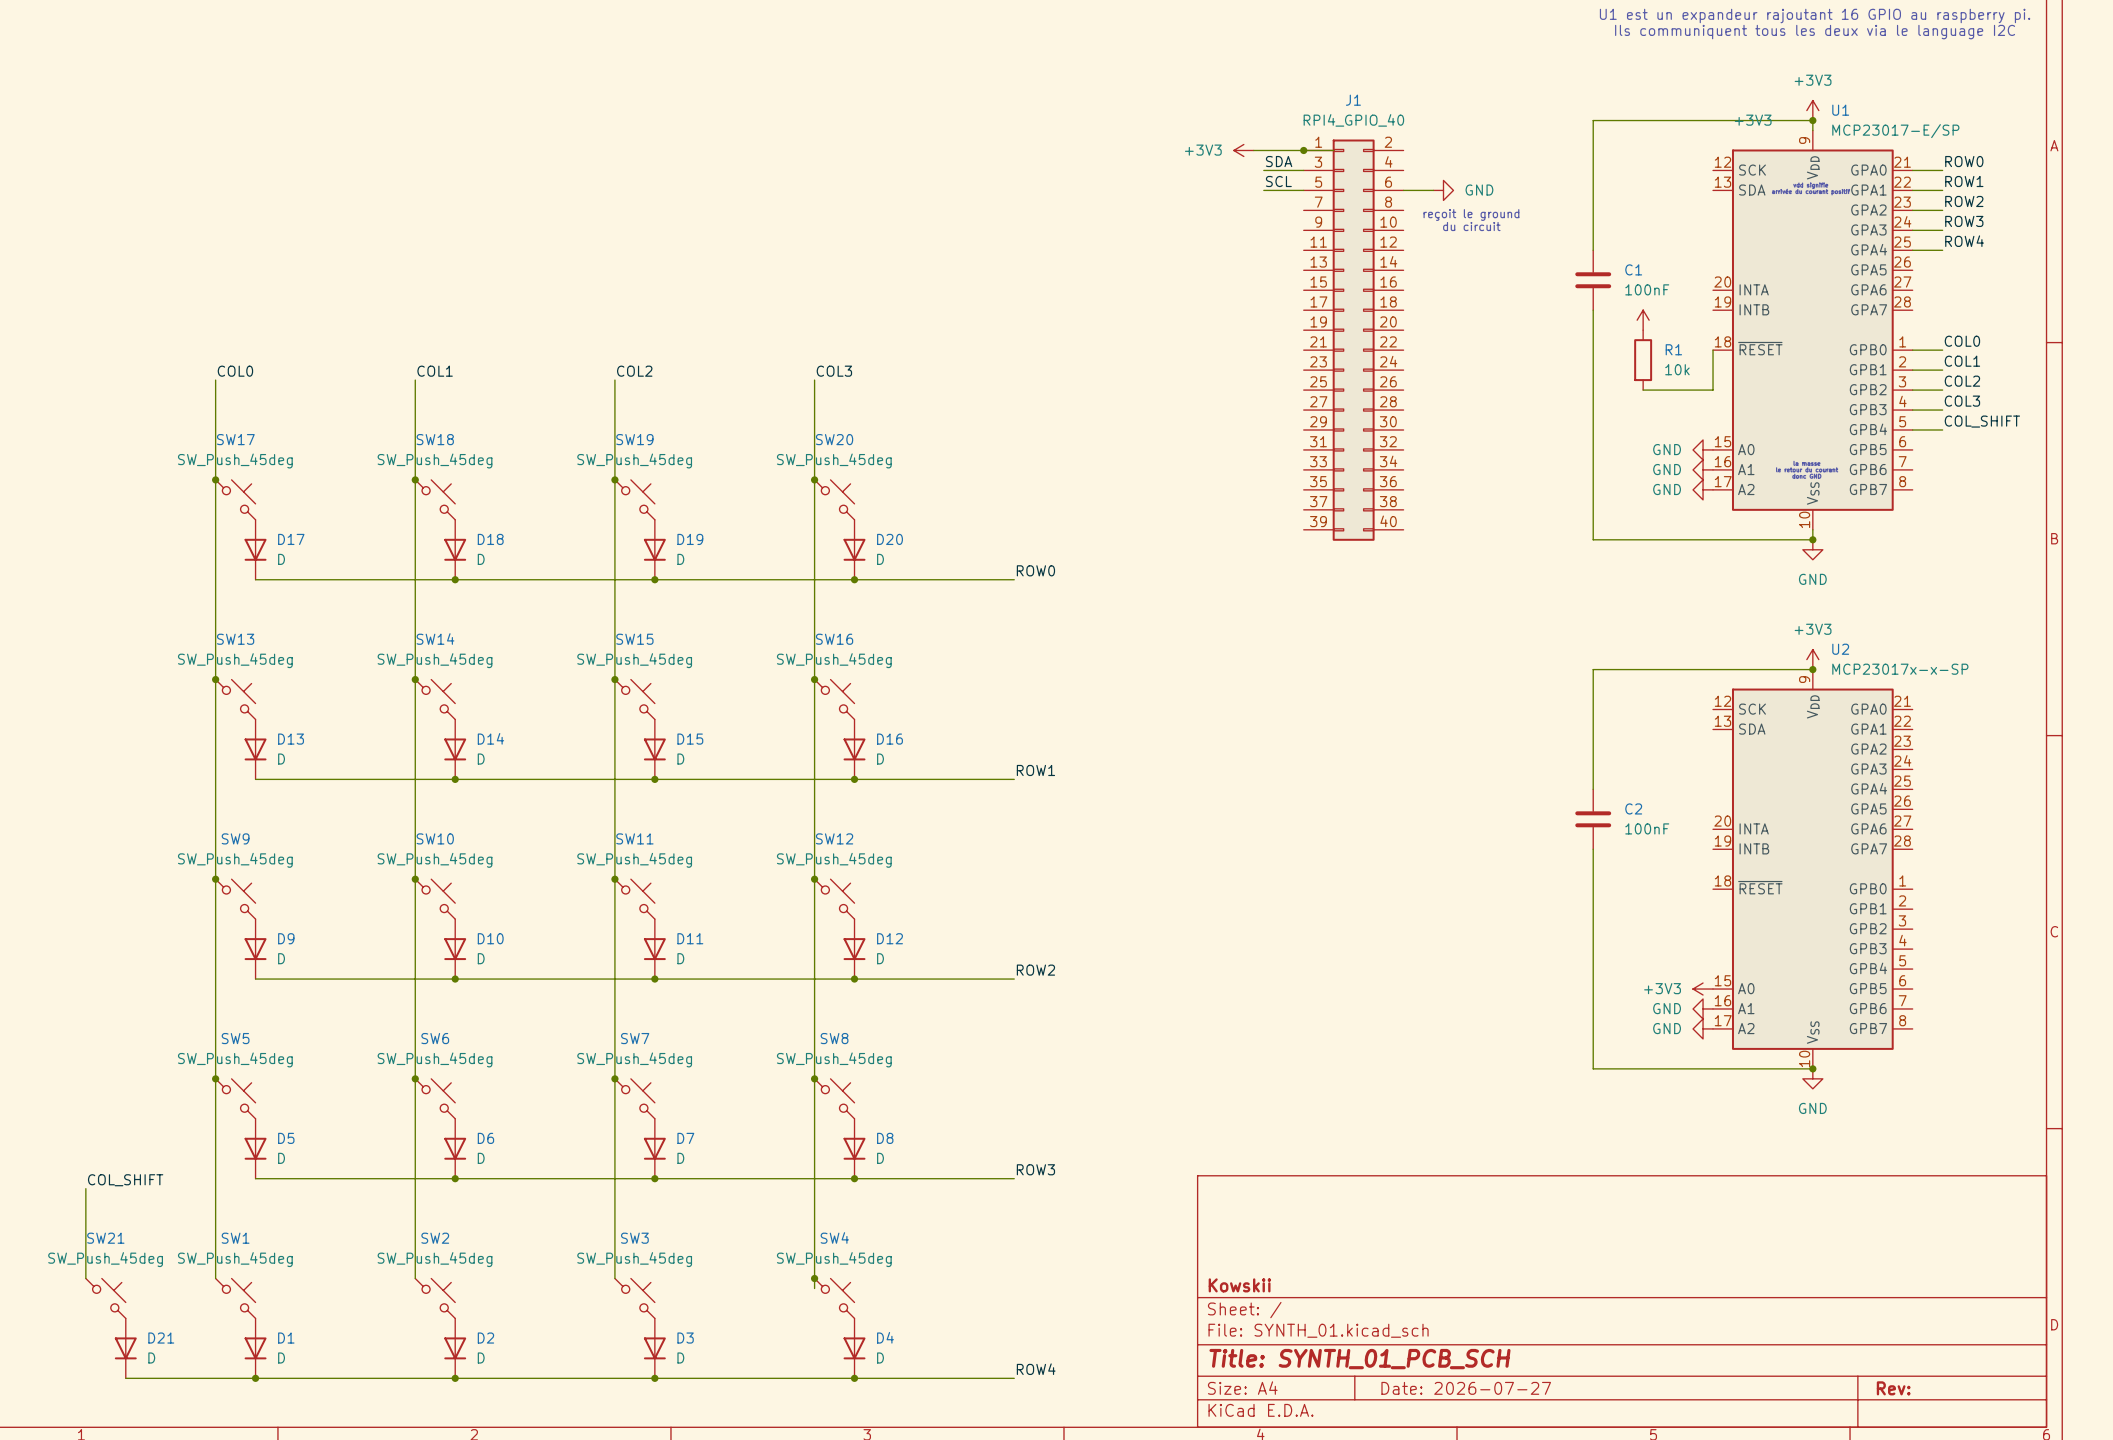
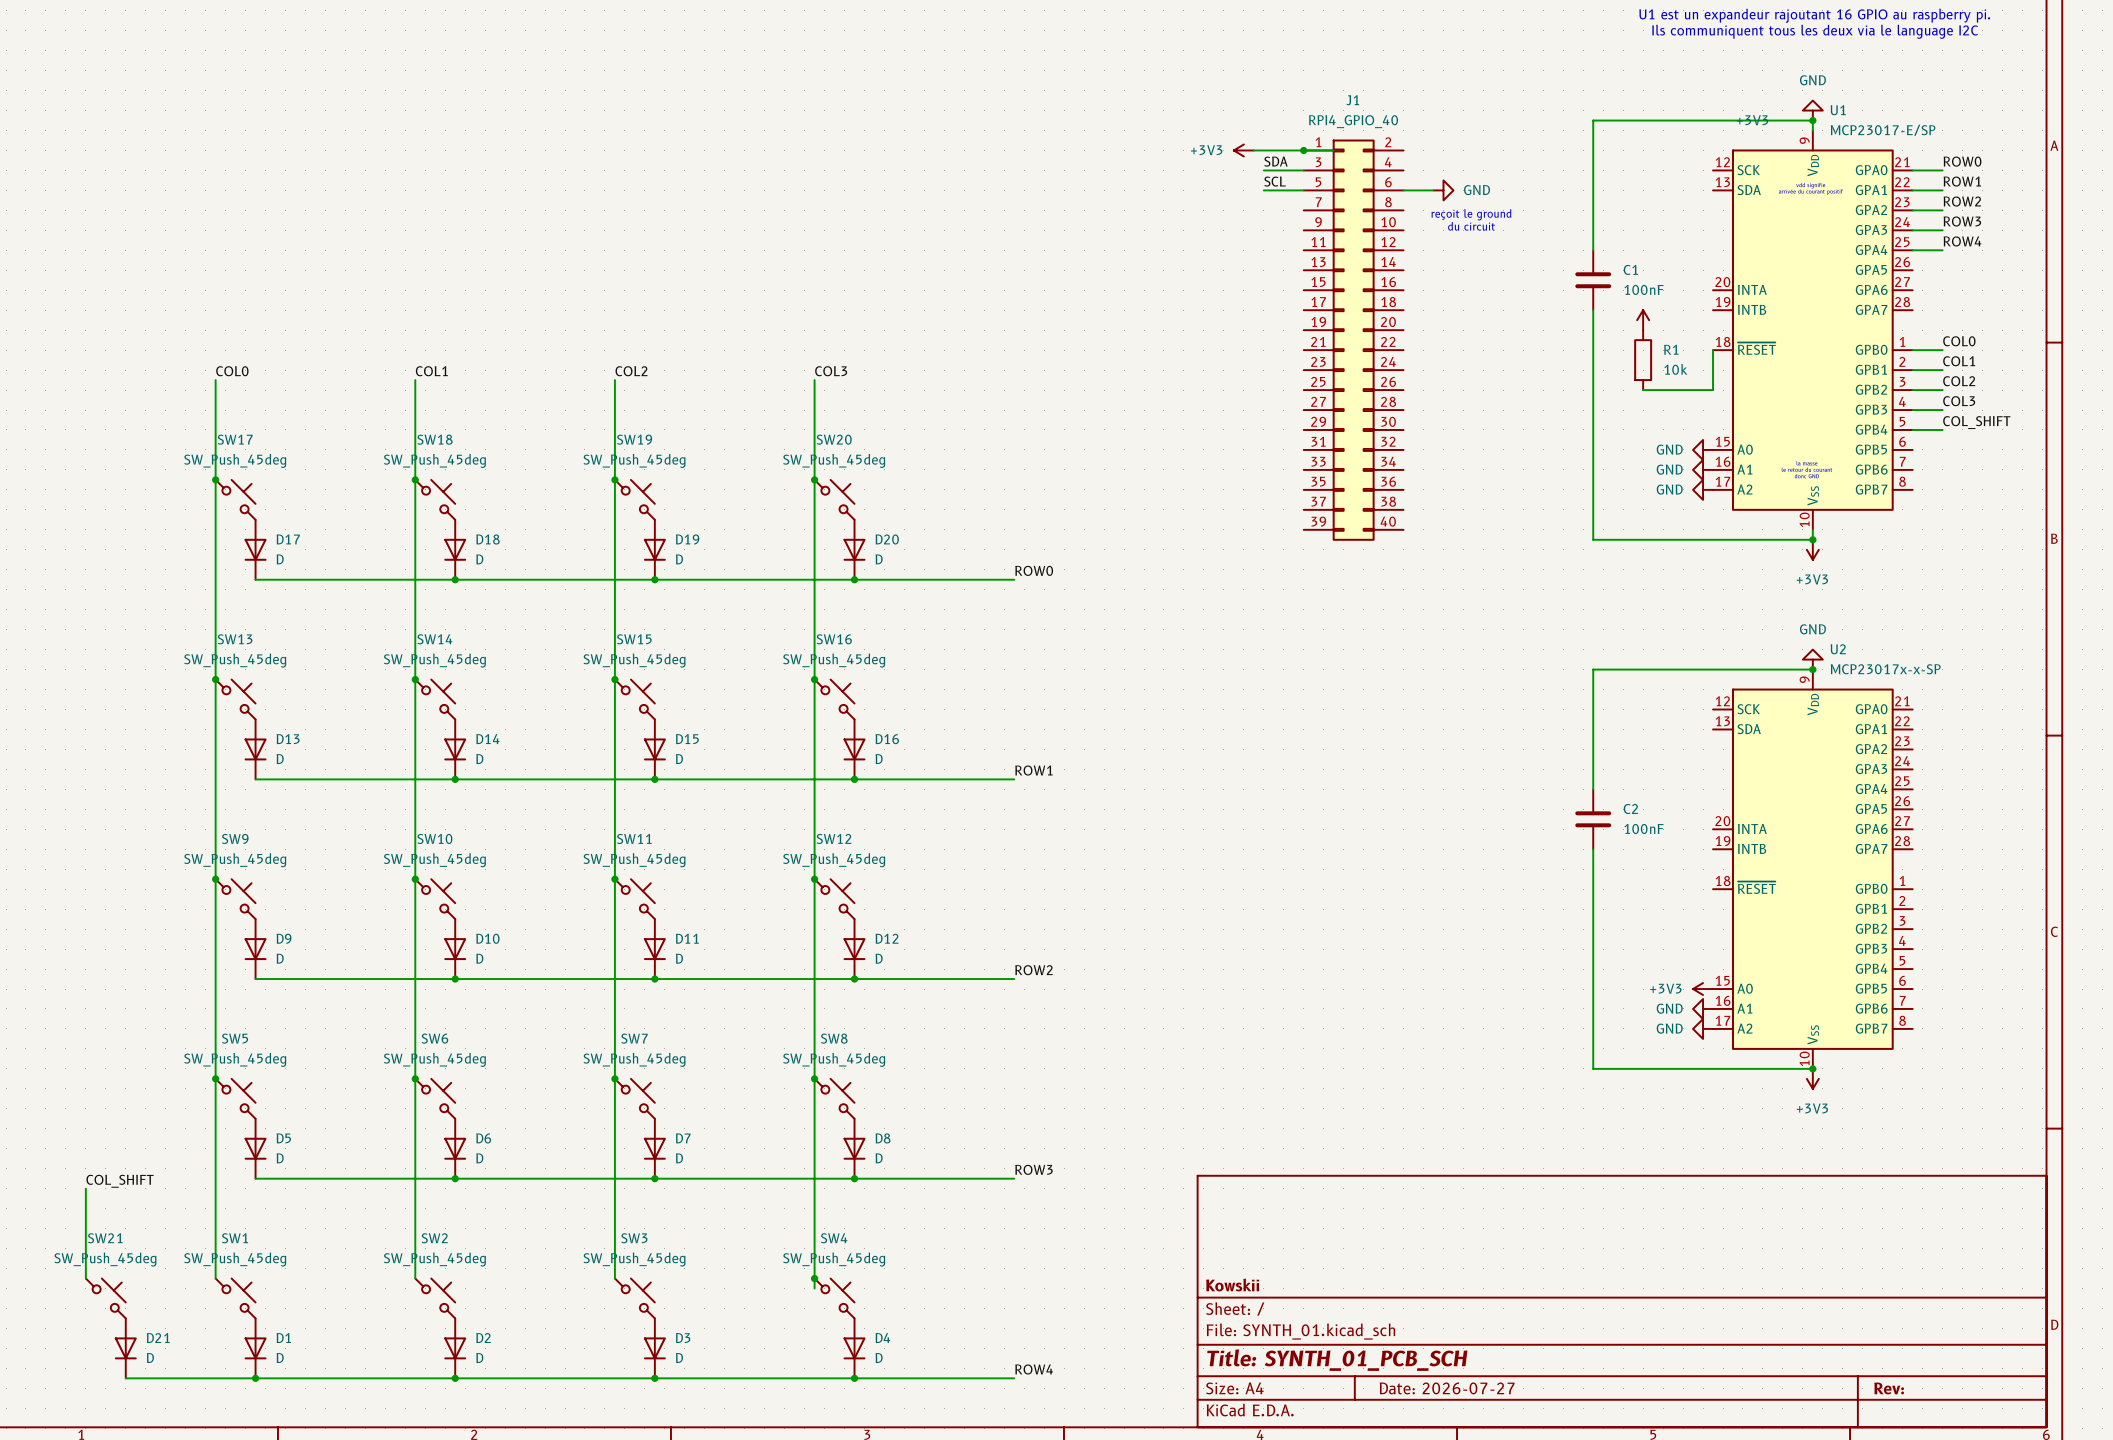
power symbol: +3V3 (1812, 110) -> GND (1812, 110)
power symbol: GND (1812, 549) -> +3V3 (1812, 549)
power symbol: +3V3 (1812, 659) -> GND (1812, 659)
power symbol: GND (1812, 1078) -> +3V3 (1812, 1078)

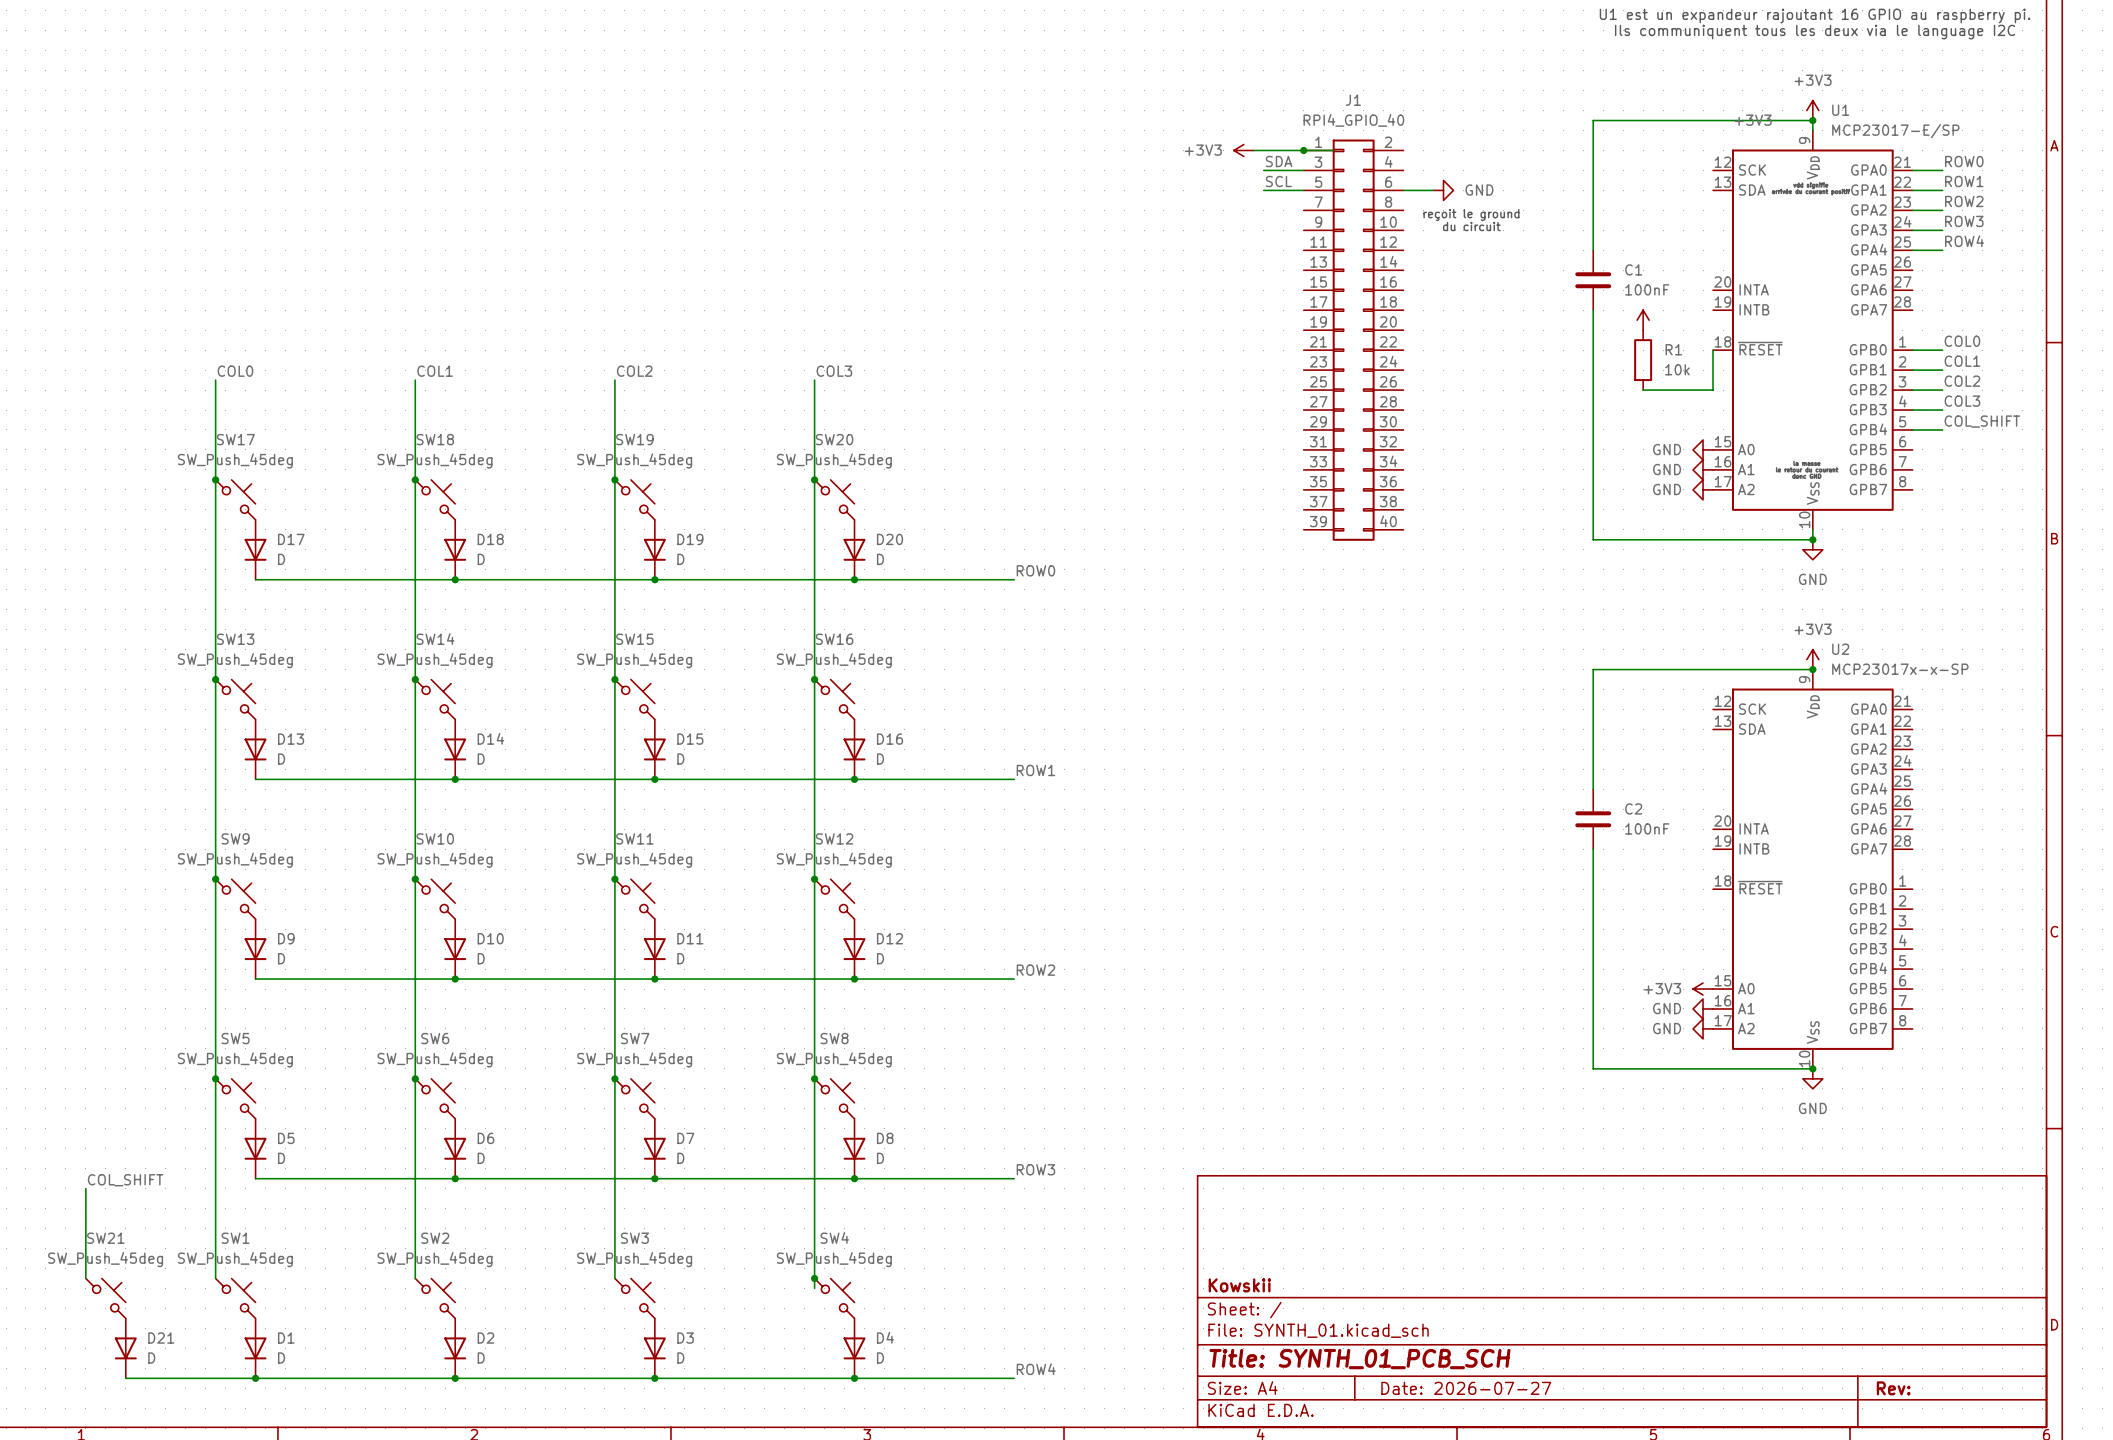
power symbol: GND (1812, 110) -> +3V3 (1812, 110)
power symbol: +3V3 (1812, 549) -> GND (1812, 549)
power symbol: GND (1812, 659) -> +3V3 (1812, 659)
power symbol: +3V3 (1812, 1078) -> GND (1812, 1078)

